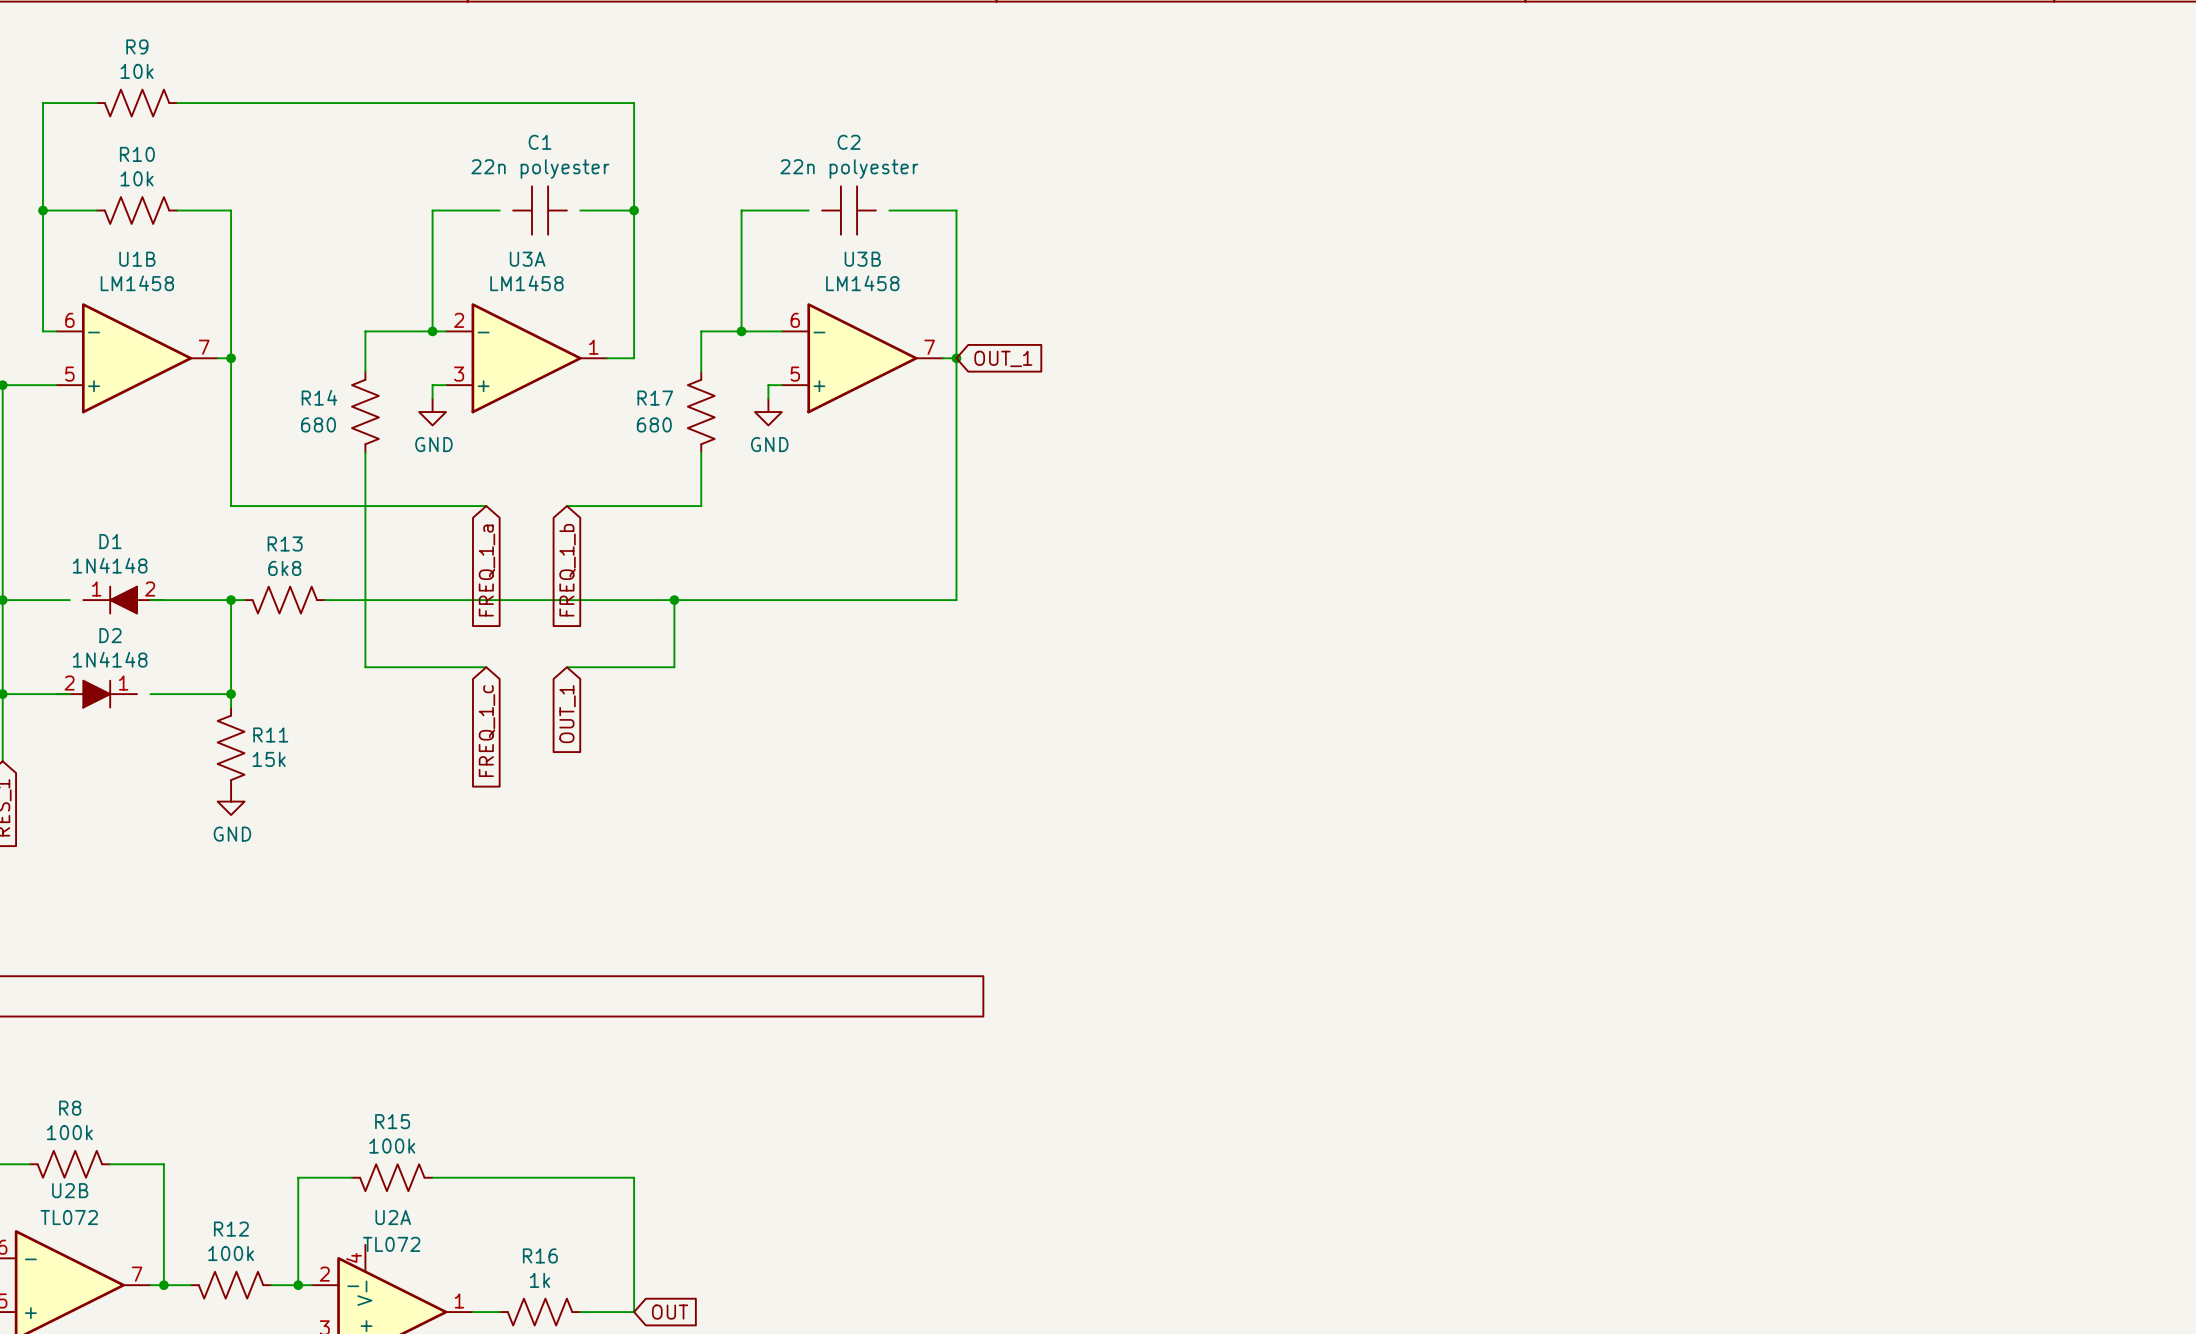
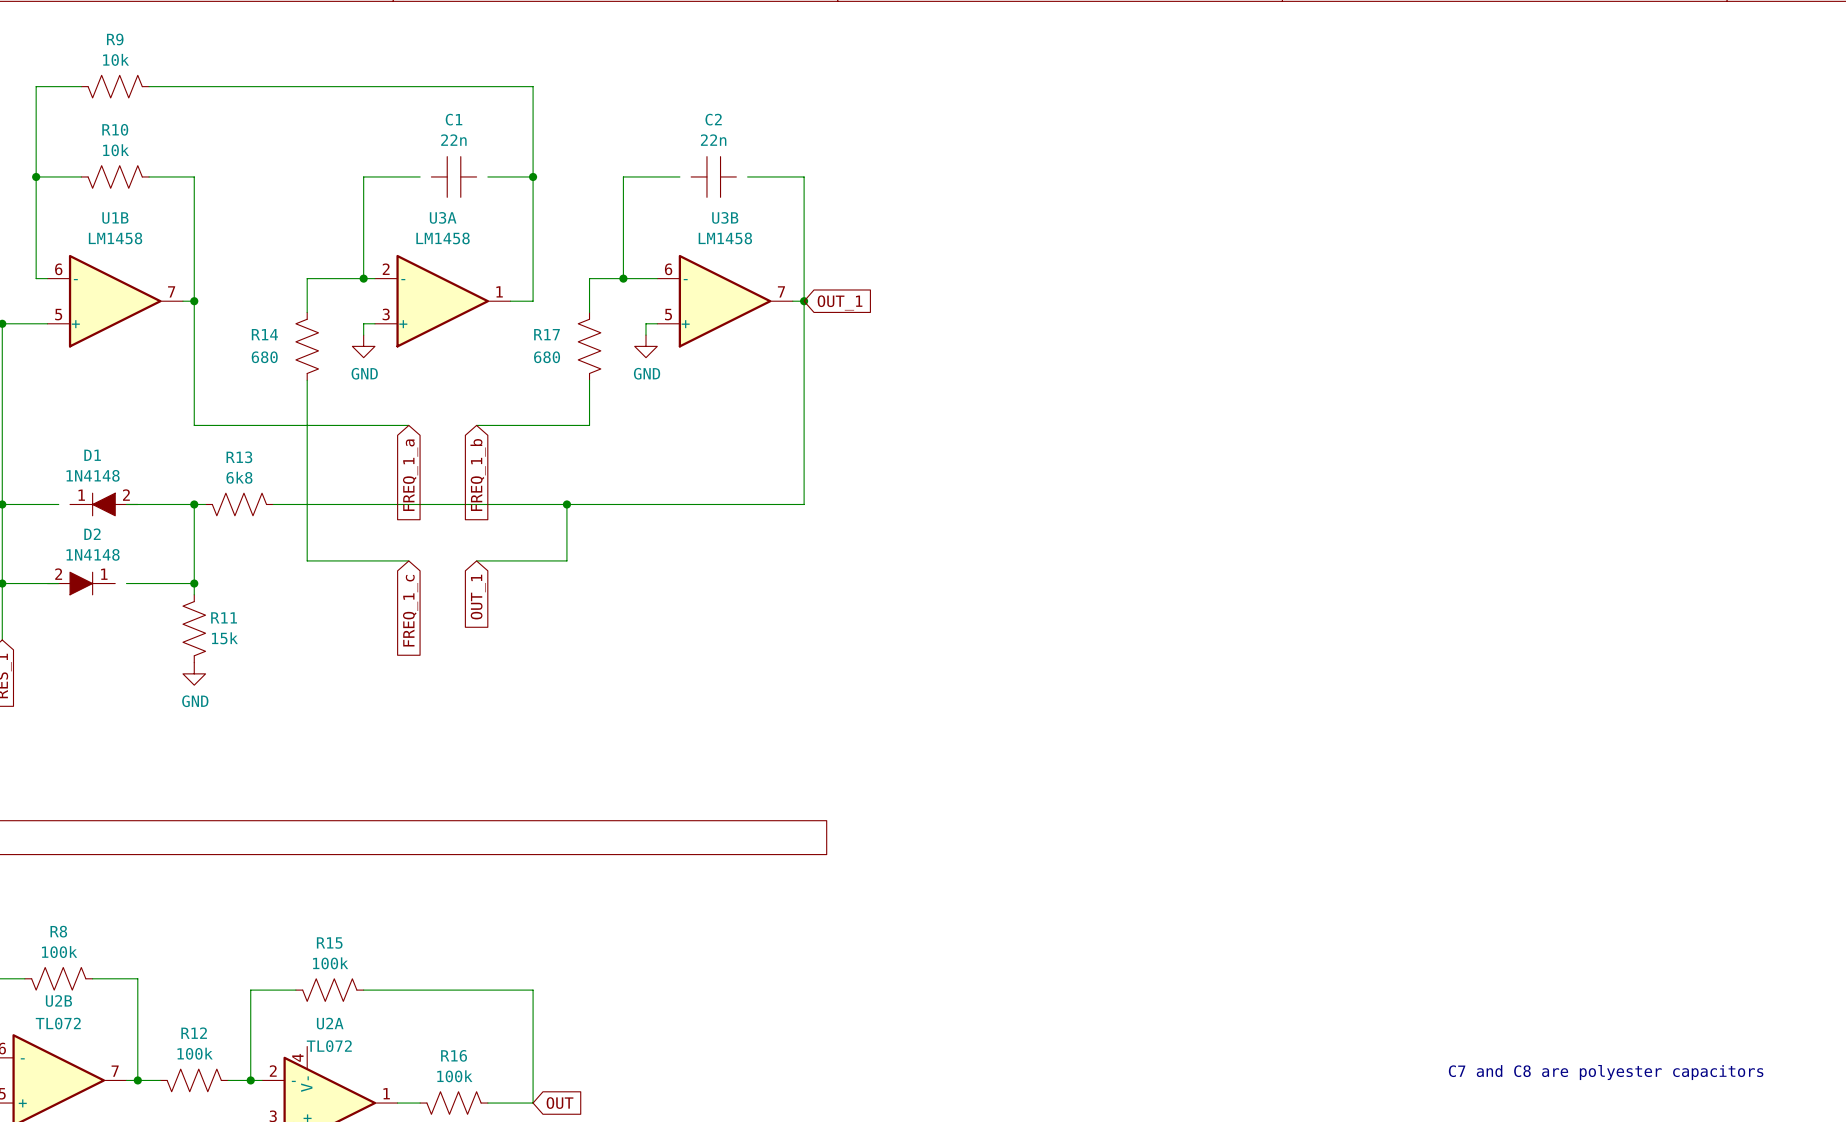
C1 value: 22n polyester (540, 169) -> 22n (453, 140)
C2 value: 22n polyester (849, 169) -> 22n (713, 140)
text: none -> C7 and C8 are polyester capacitors (1606, 1072)
R16 value: 1k (540, 1280) -> 100k (454, 1076)

